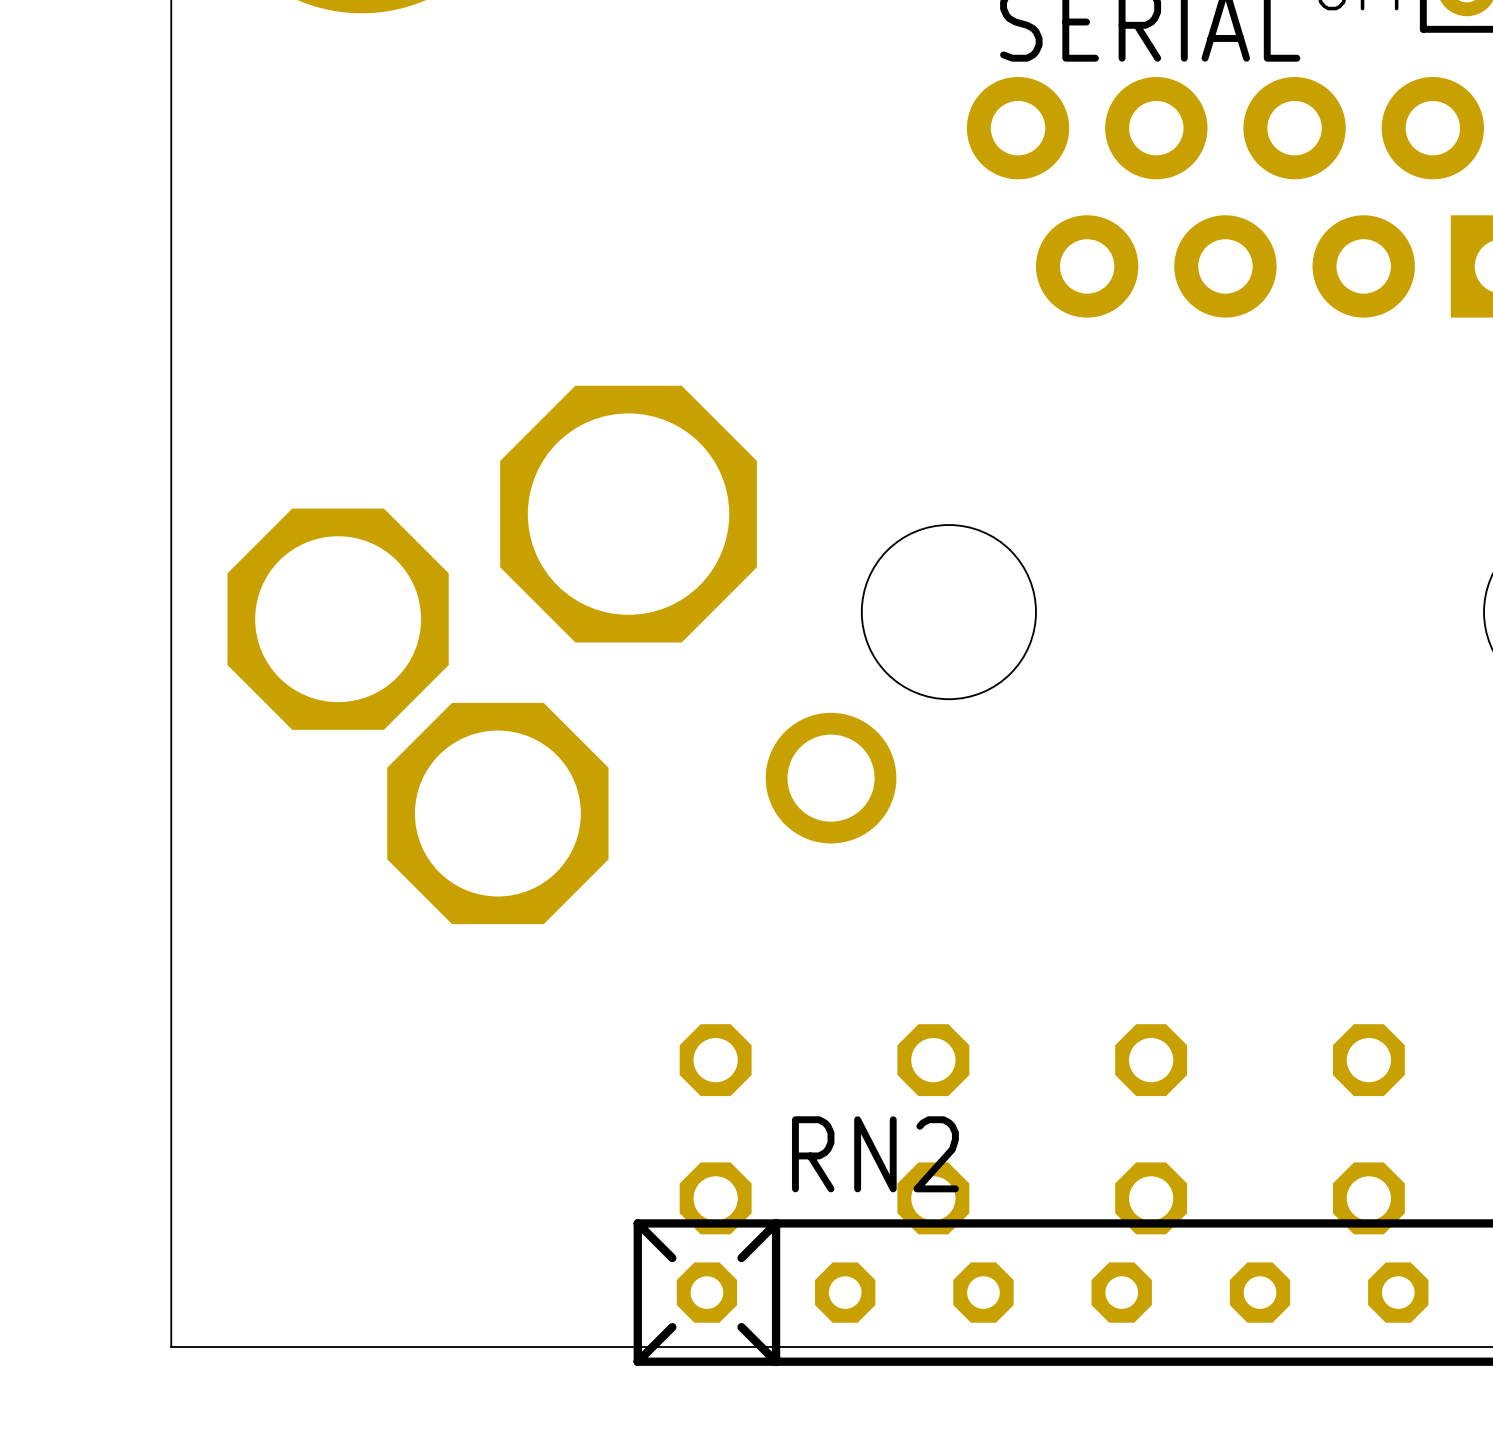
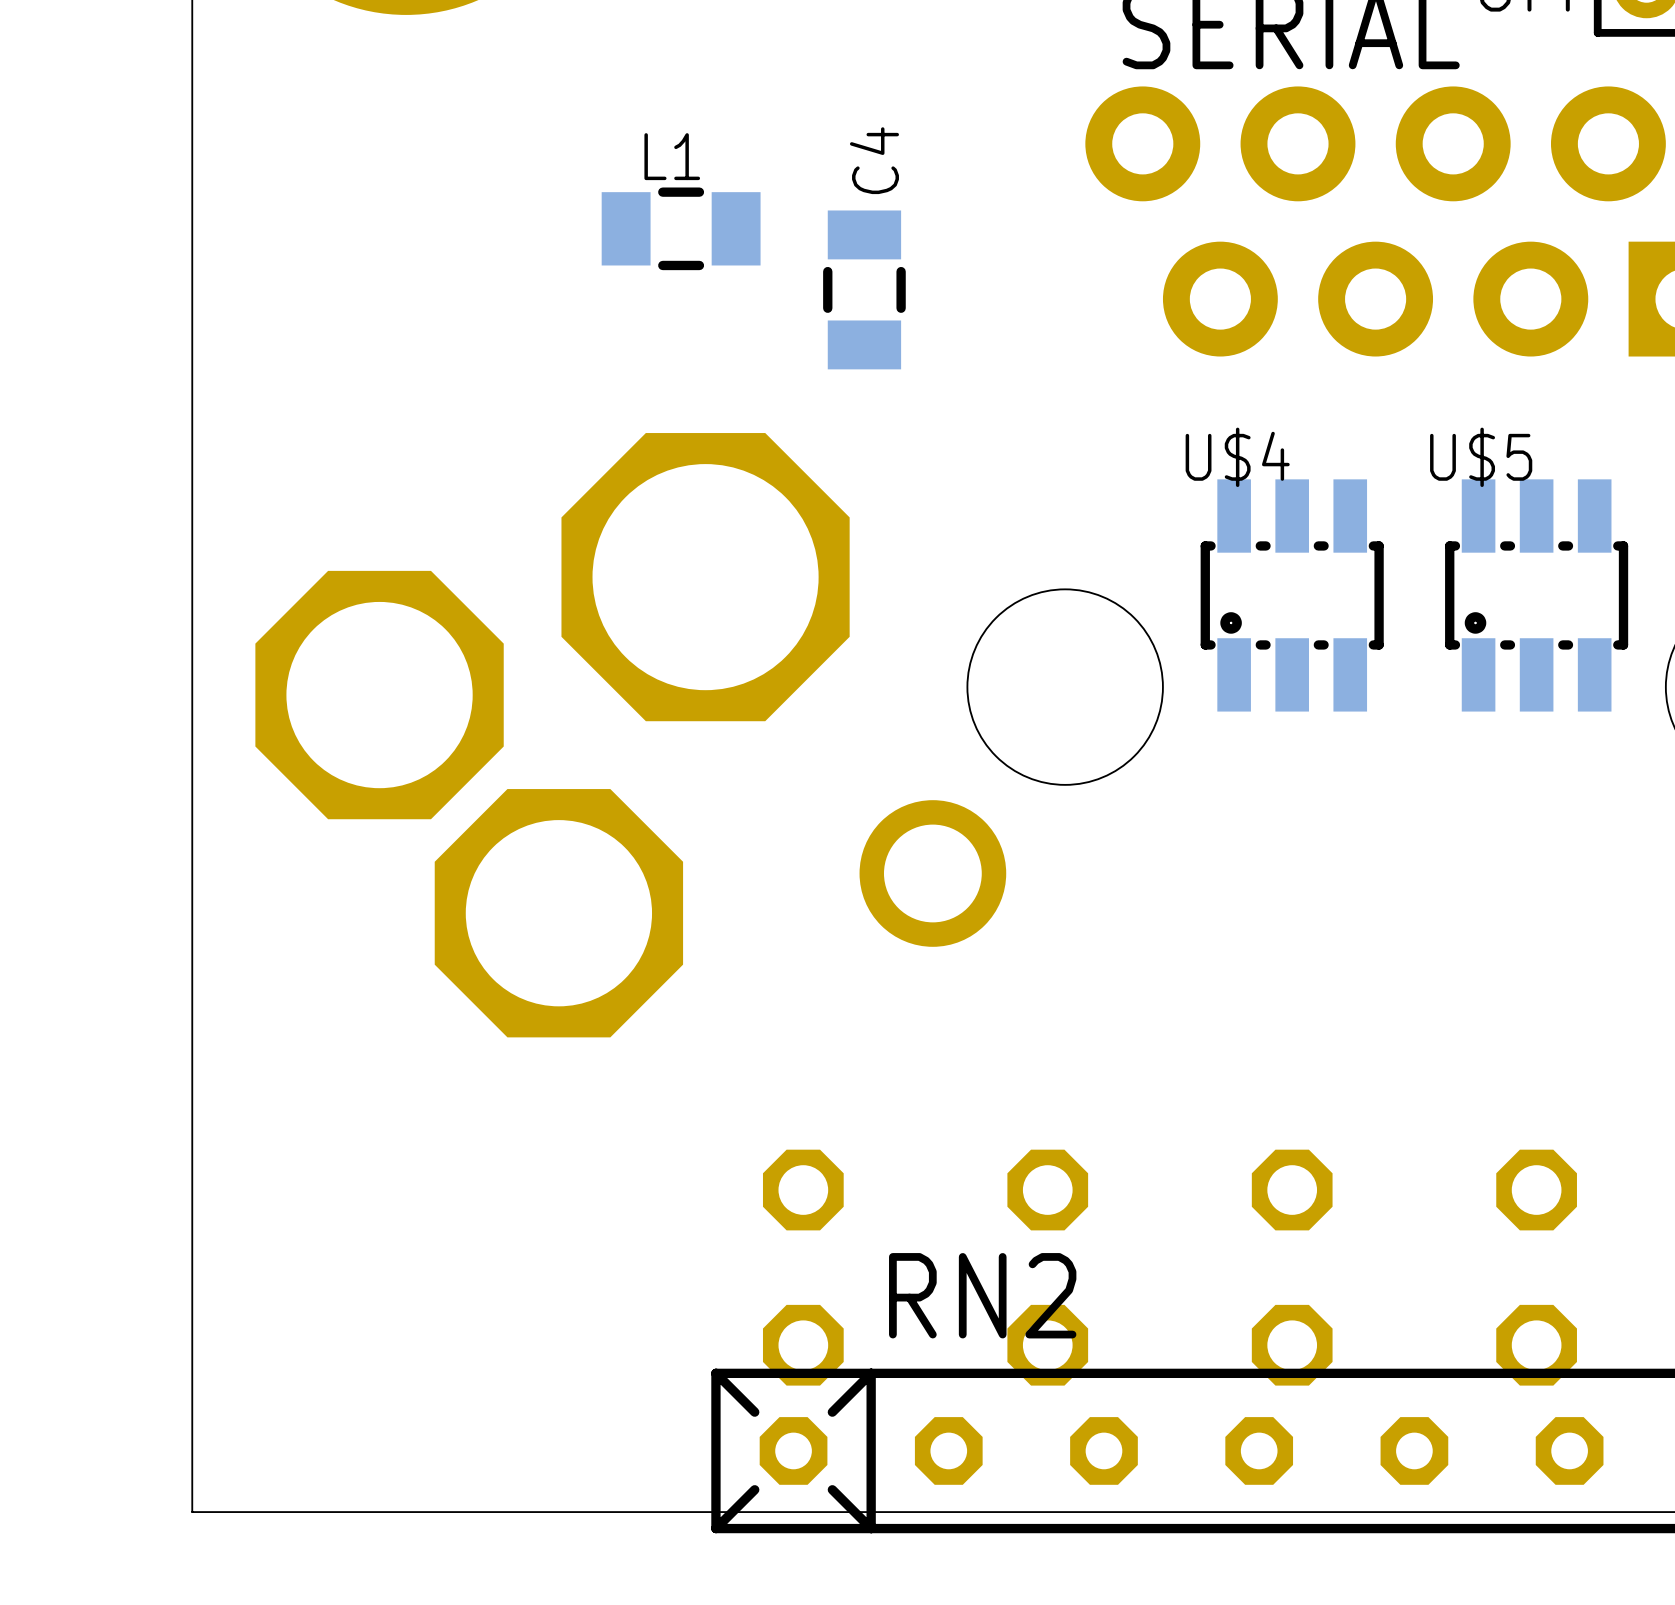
L1: none -> (681, 228)
C4: none -> (864, 289)
U$4: none -> (1292, 595)
U$5: none -> (1536, 595)

